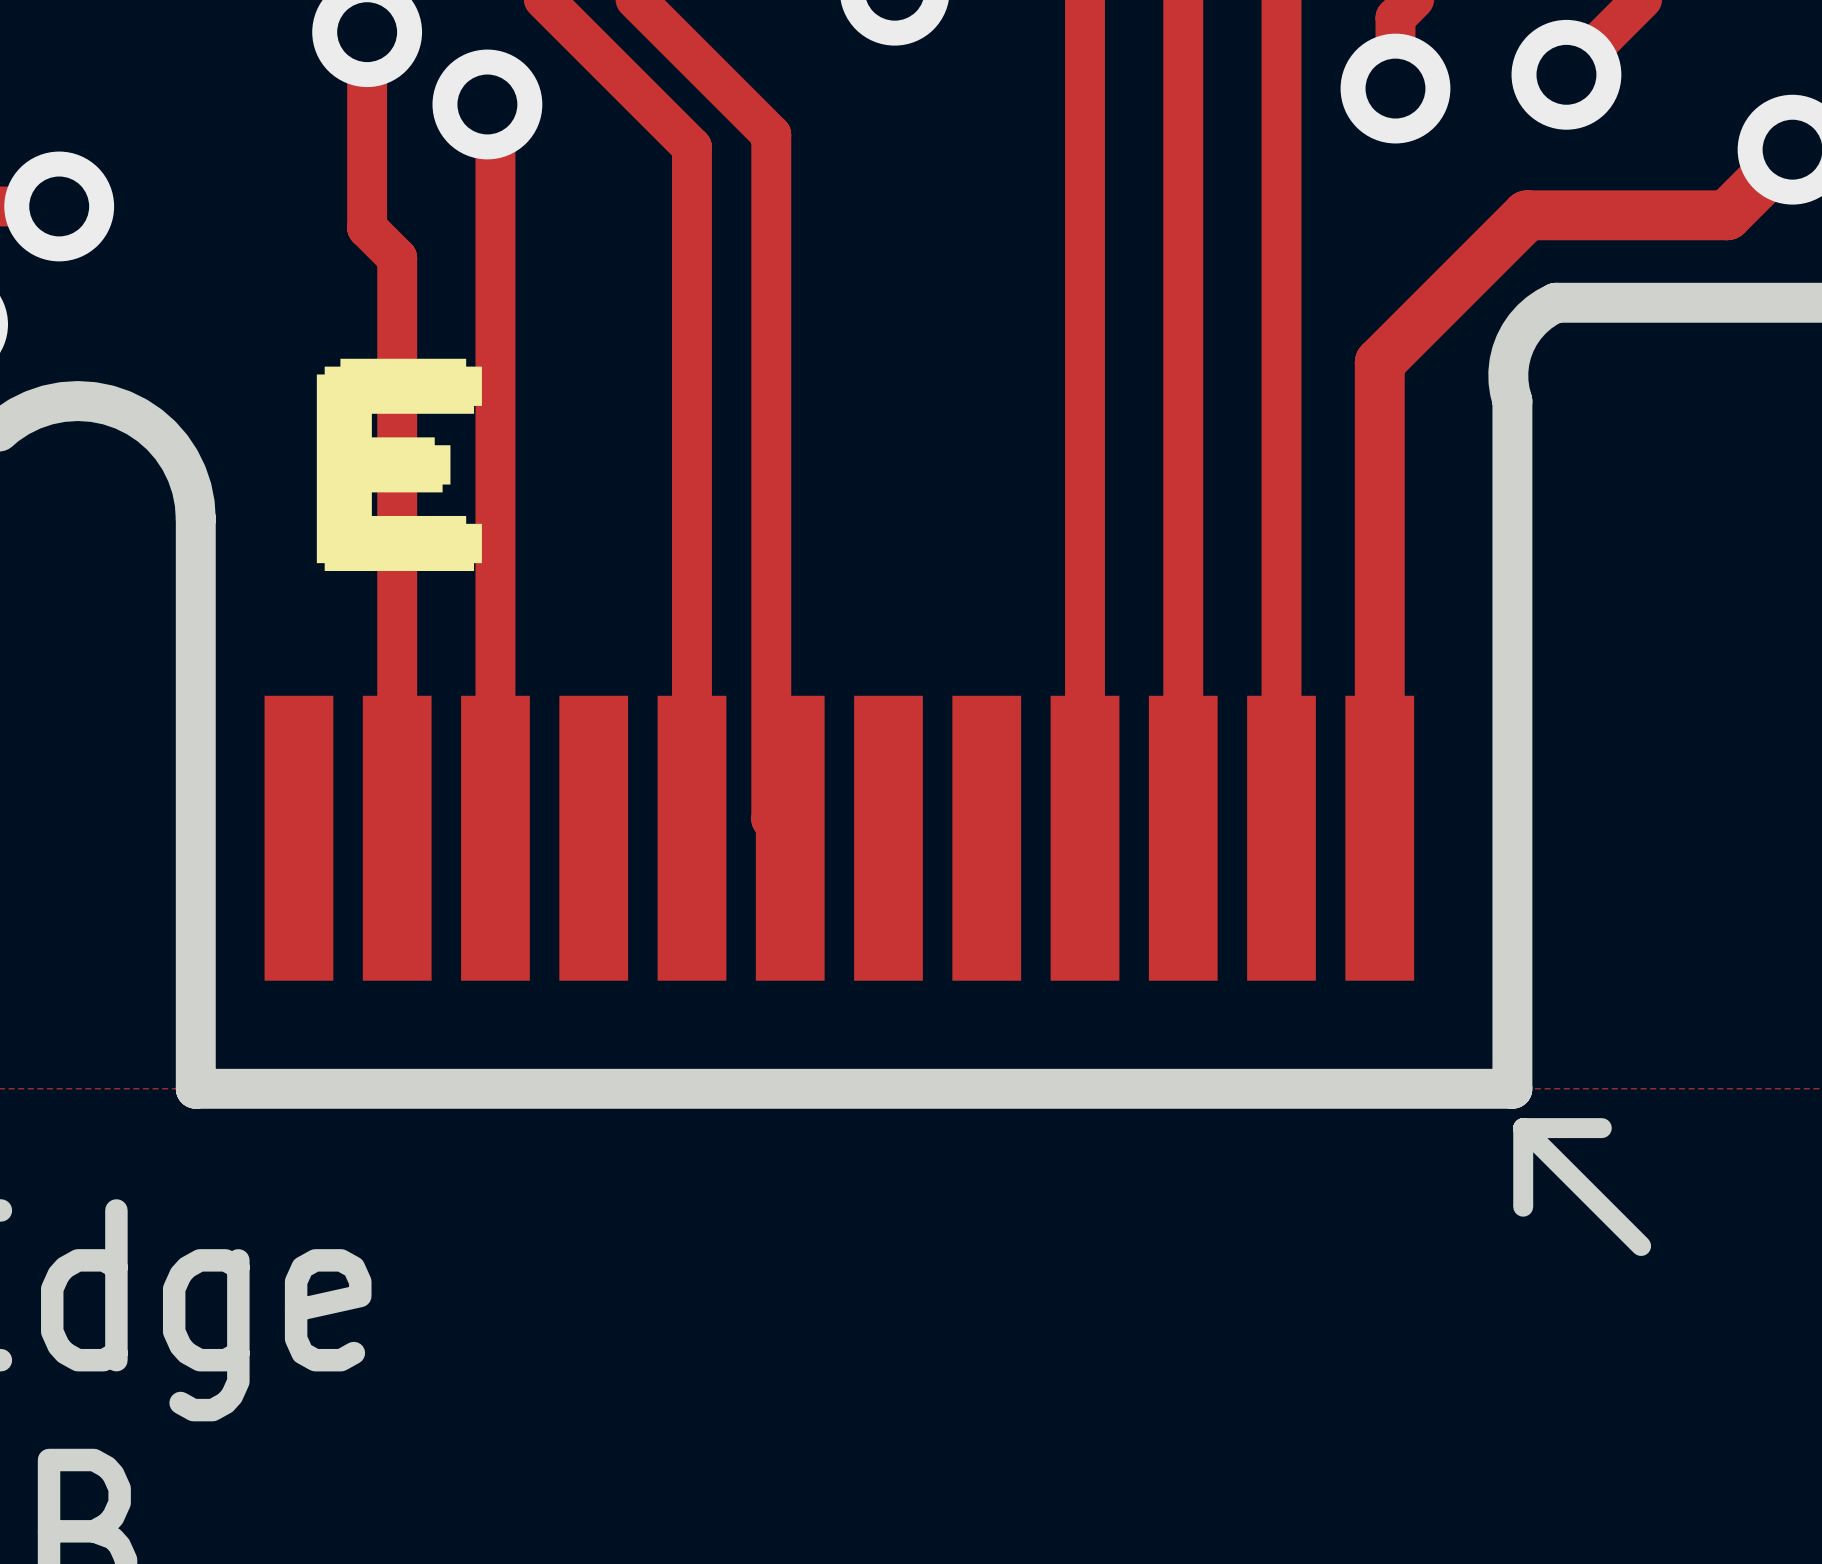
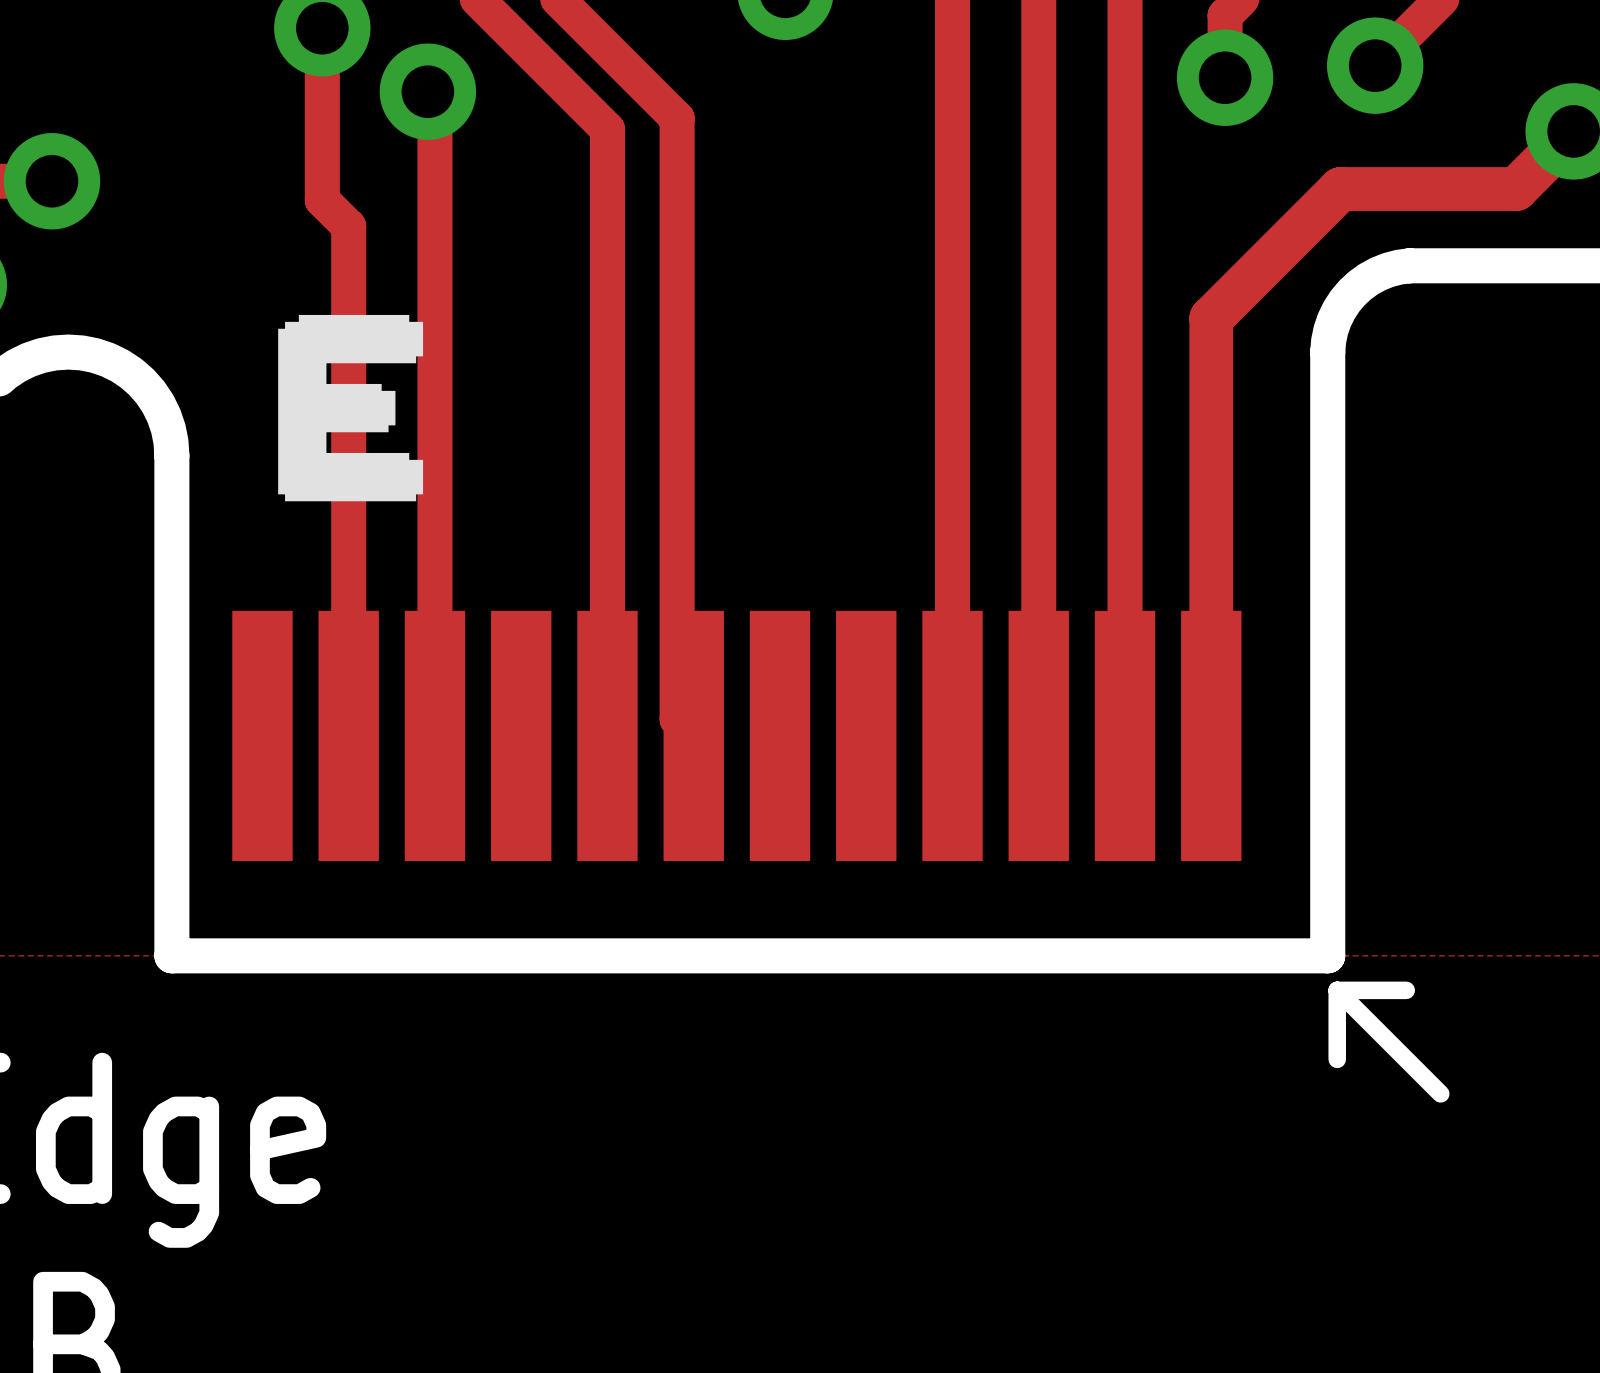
board edge: (1605, 302) (1555, 302) (1531, 319) (1519, 334) (1511, 352) (1508, 381) (1512, 401) -> (1409, 265) (1378, 273) (1351, 292) (1334, 320) (1327, 352)

